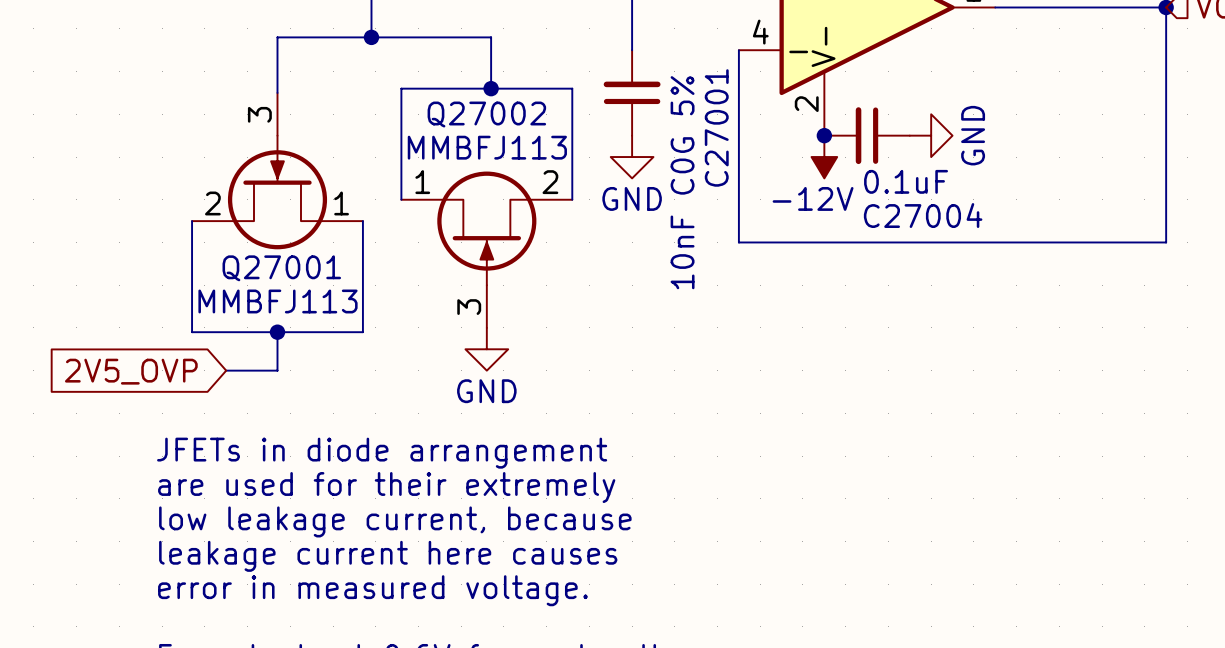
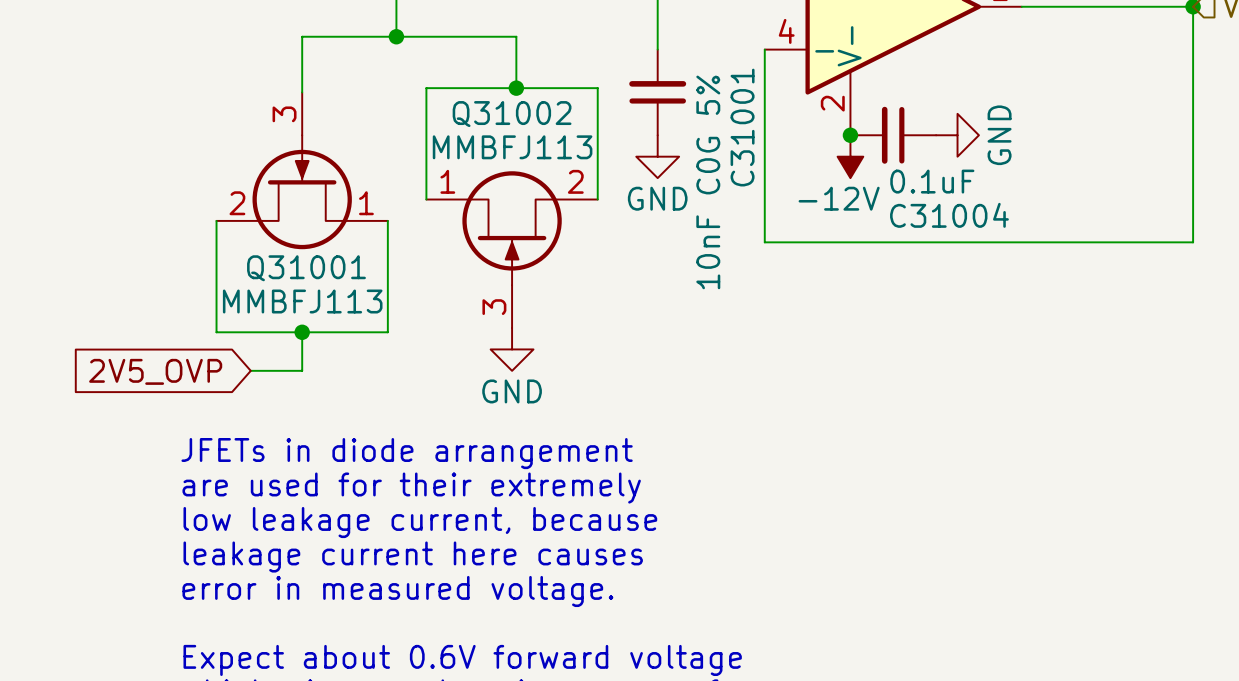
Q27002 name: Q27002 (486, 114) -> Q31002 (512, 114)
C27001 name: C27001 (716, 127) -> C31001 (742, 127)
C27004 name: C27004 (923, 215) -> C31004 (949, 215)
Q27001 name: Q27001 (281, 268) -> Q31001 (306, 268)

